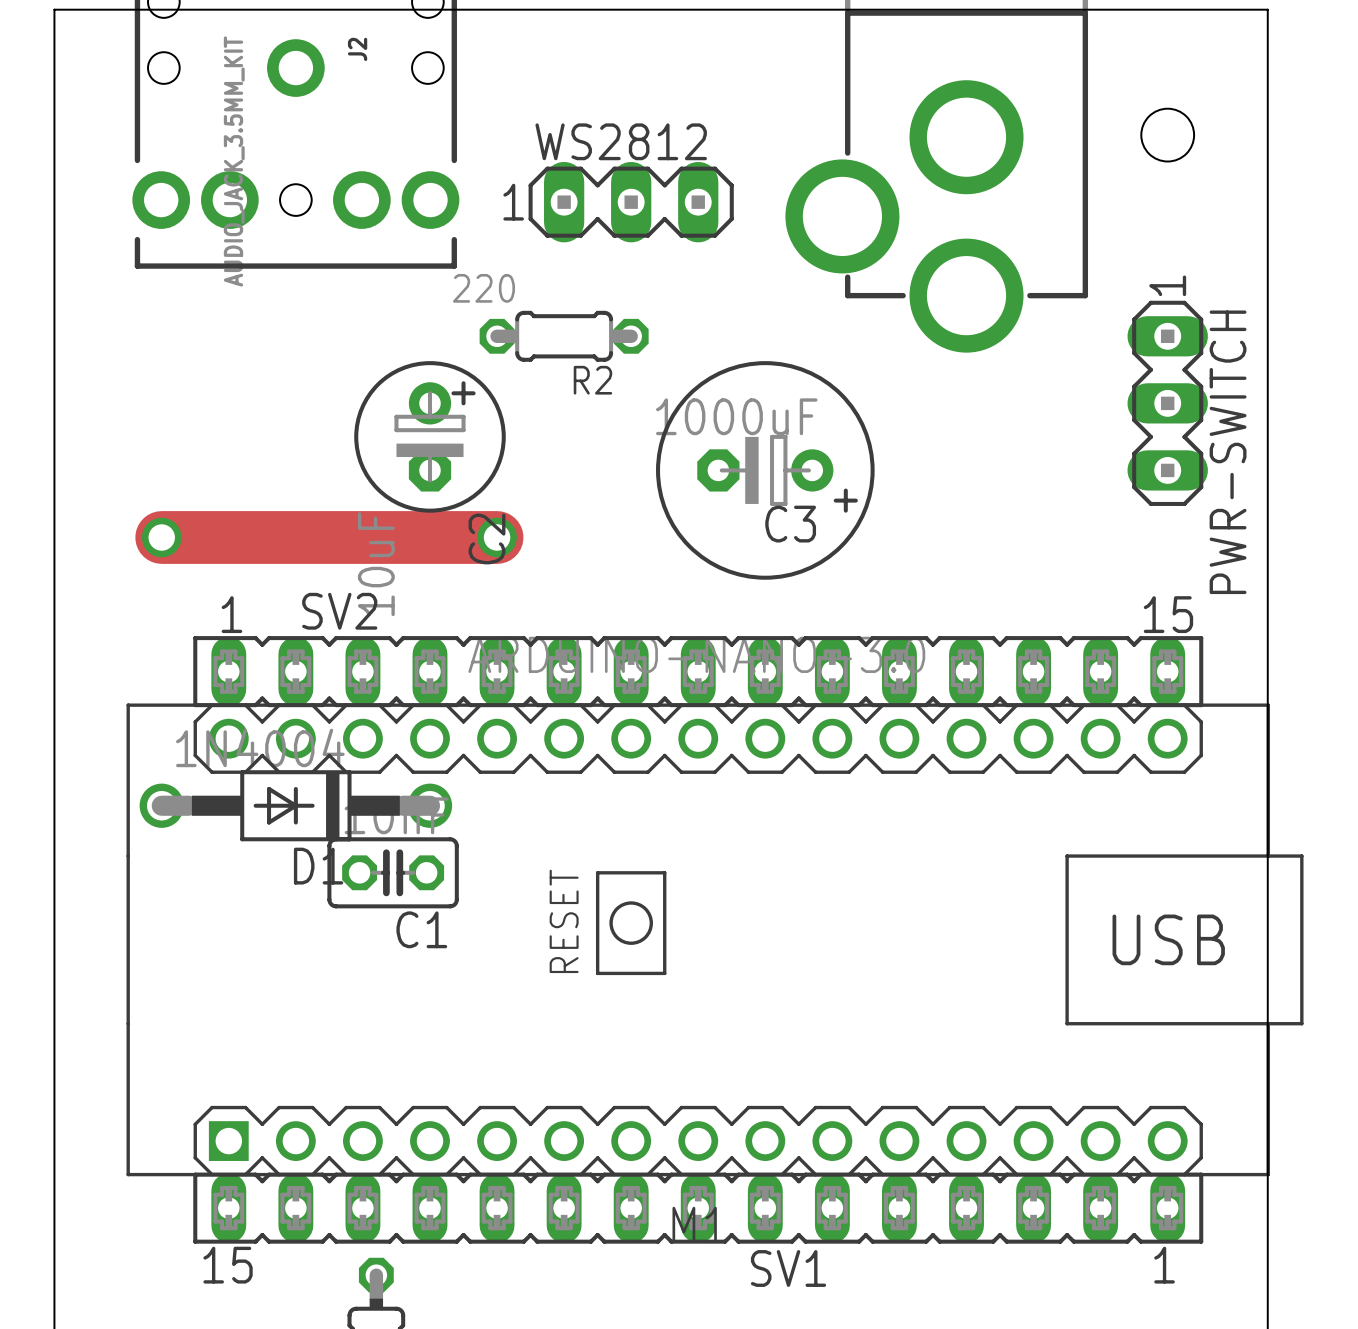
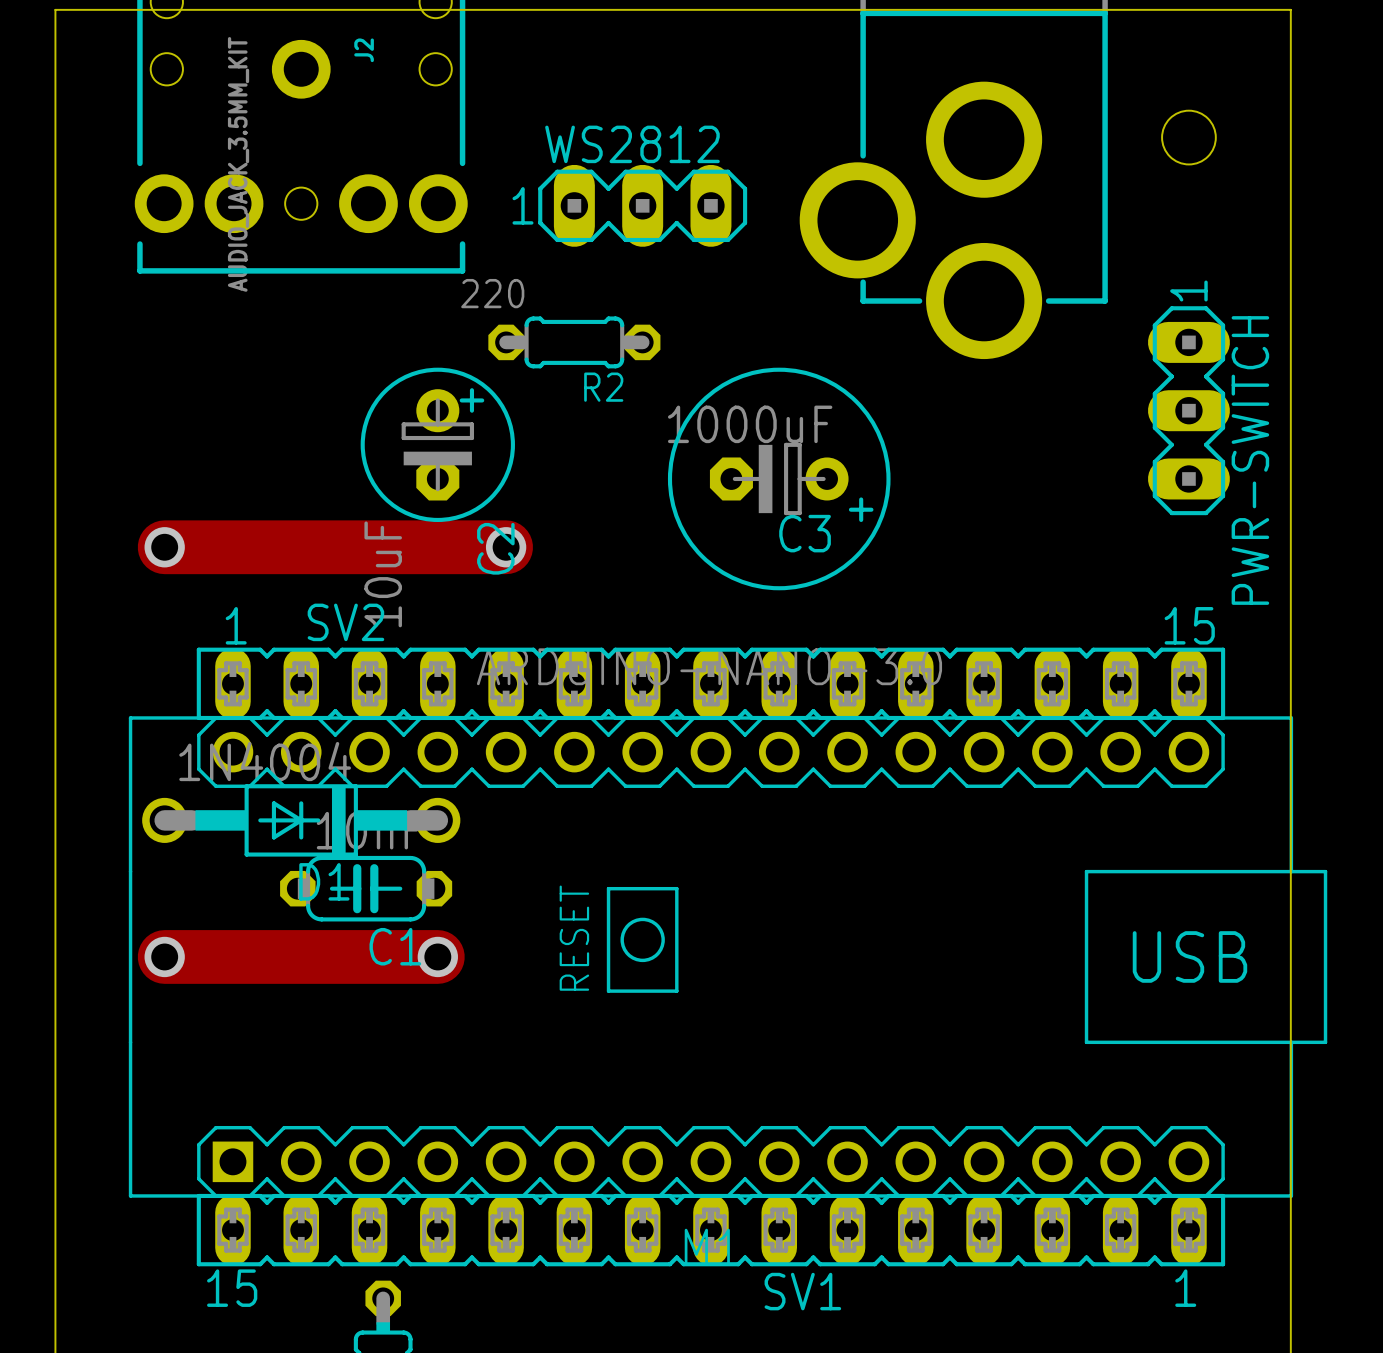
C1 footprint: [327, 837, 459, 909] -> [280, 855, 453, 922]
track: none -> (164, 956) (437, 956)
via: none -> (164, 956)
via: none -> (437, 956)

